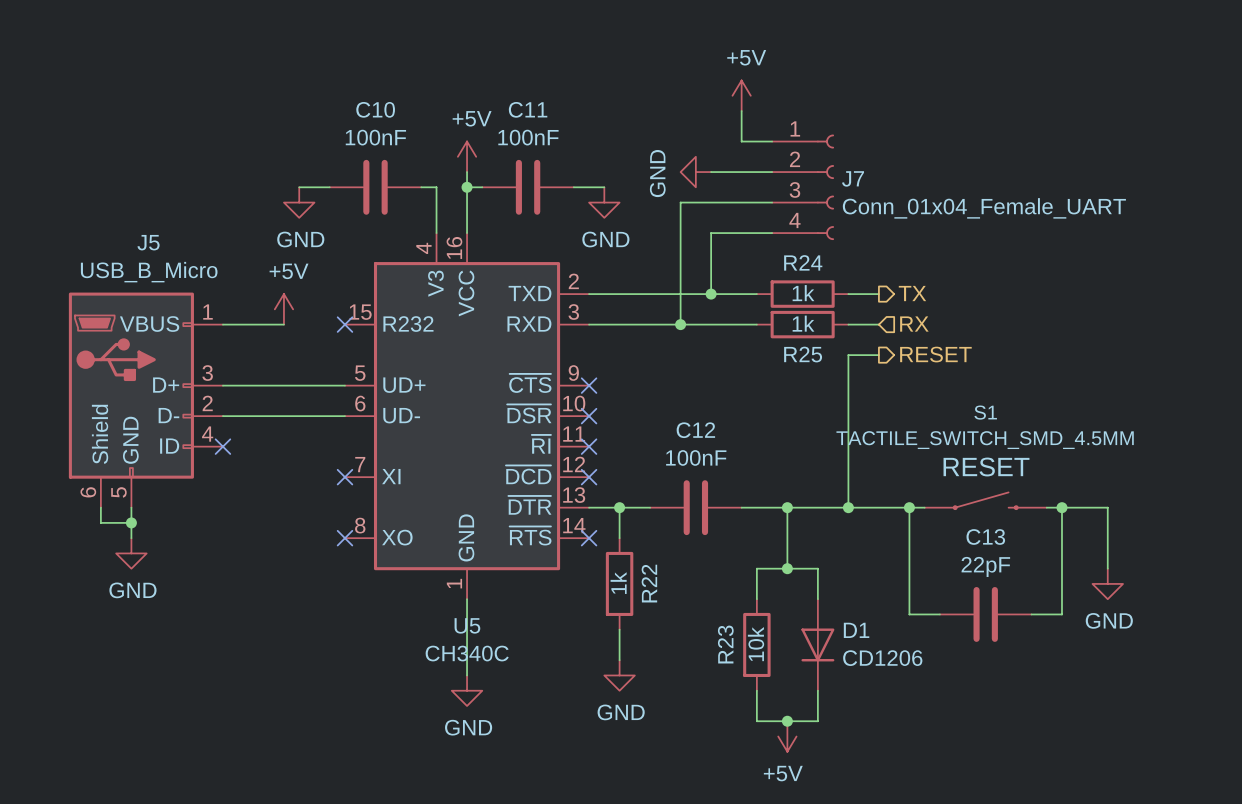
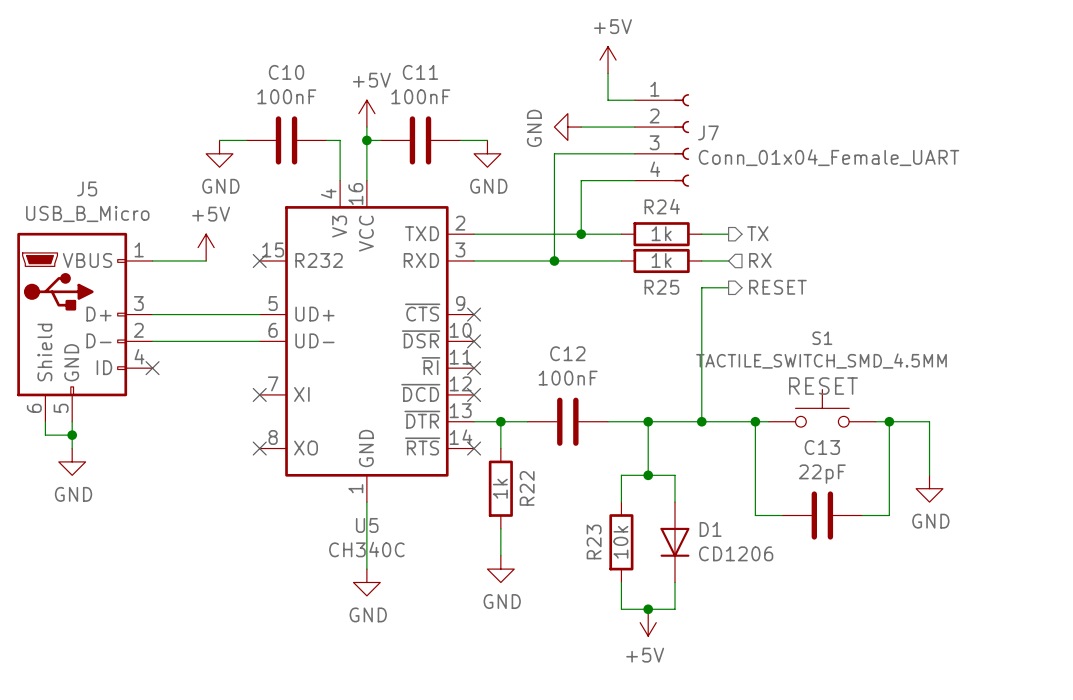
S1 symbol: [924, 492, 1047, 510] -> [768, 389, 876, 428]

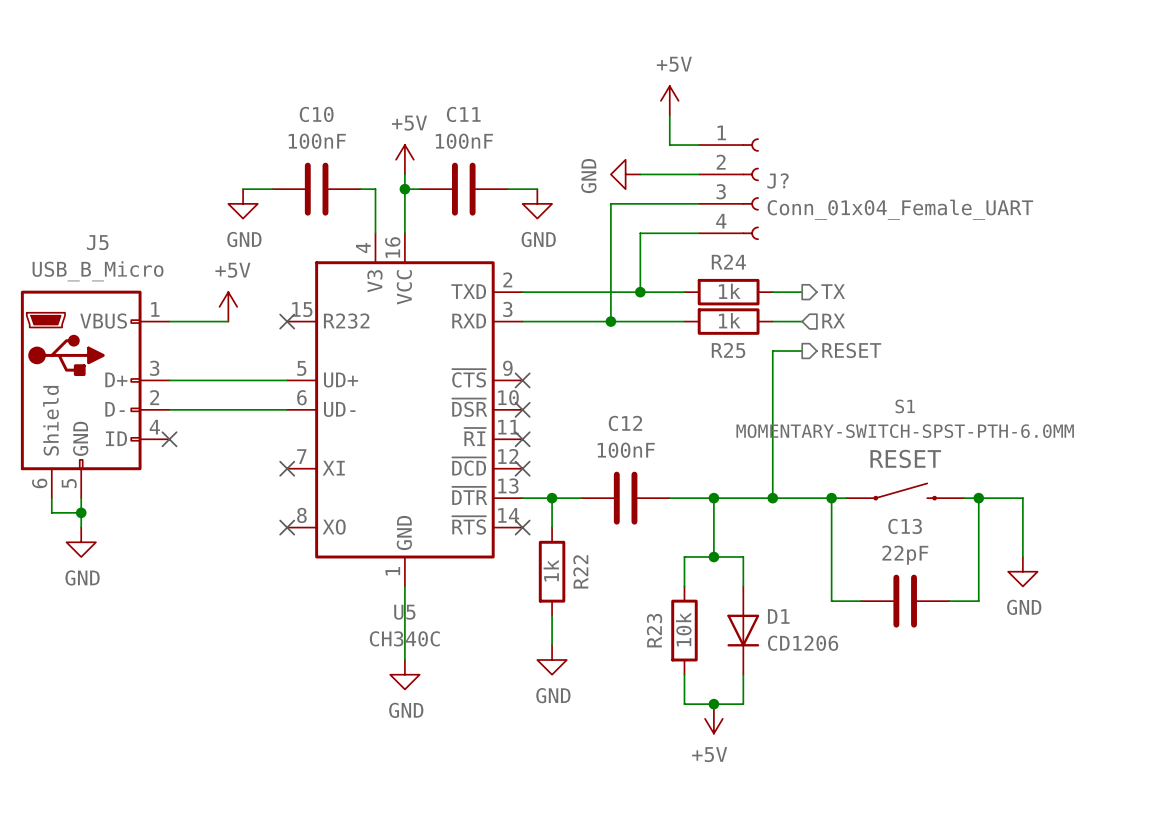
J7 name: J7 (708, 132) -> J? (778, 180)
S1 value: TACTILE_SWITCH_SMD_4.5MM (821, 361) -> MOMENTARY-SWITCH-SPST-PTH-6.0MM (905, 431)
S1 symbol: [768, 389, 876, 428] -> [846, 483, 965, 500]

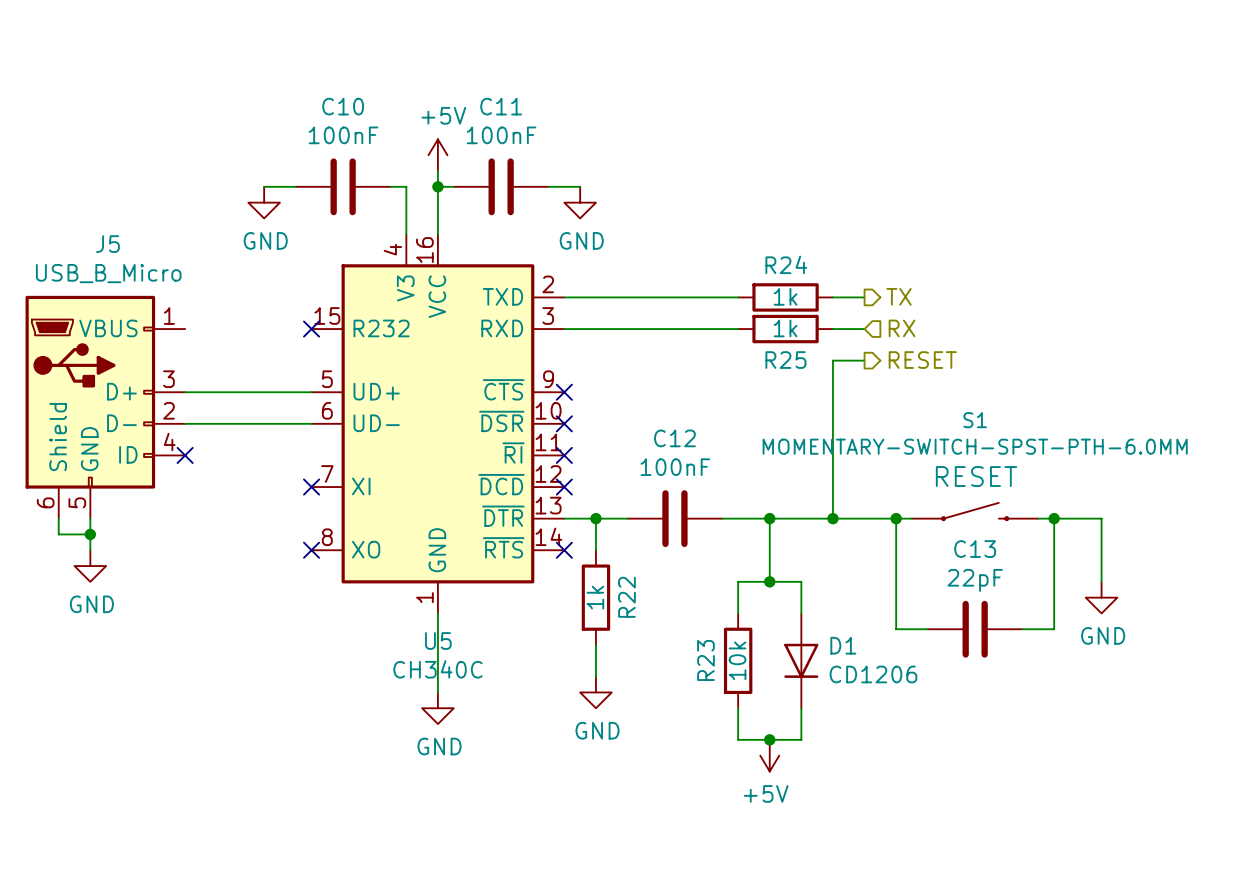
power symbol: +5V (669, 100) -> none
wire: (669, 115) (669, 145) (699, 145) -> none
power symbol: GND (625, 174) -> none
wire: (640, 174) (699, 174) -> none
J?: Conn_01x04_Female_UART (729, 189) -> none
wire: (699, 203) (610, 203) (610, 321) -> none
wire: (699, 233) (640, 233) (640, 292) -> none
junction: (640, 292) -> none
power symbol: +5V (228, 306) -> none
wire: (169, 321) (228, 321) -> none
junction: (610, 321) -> none

